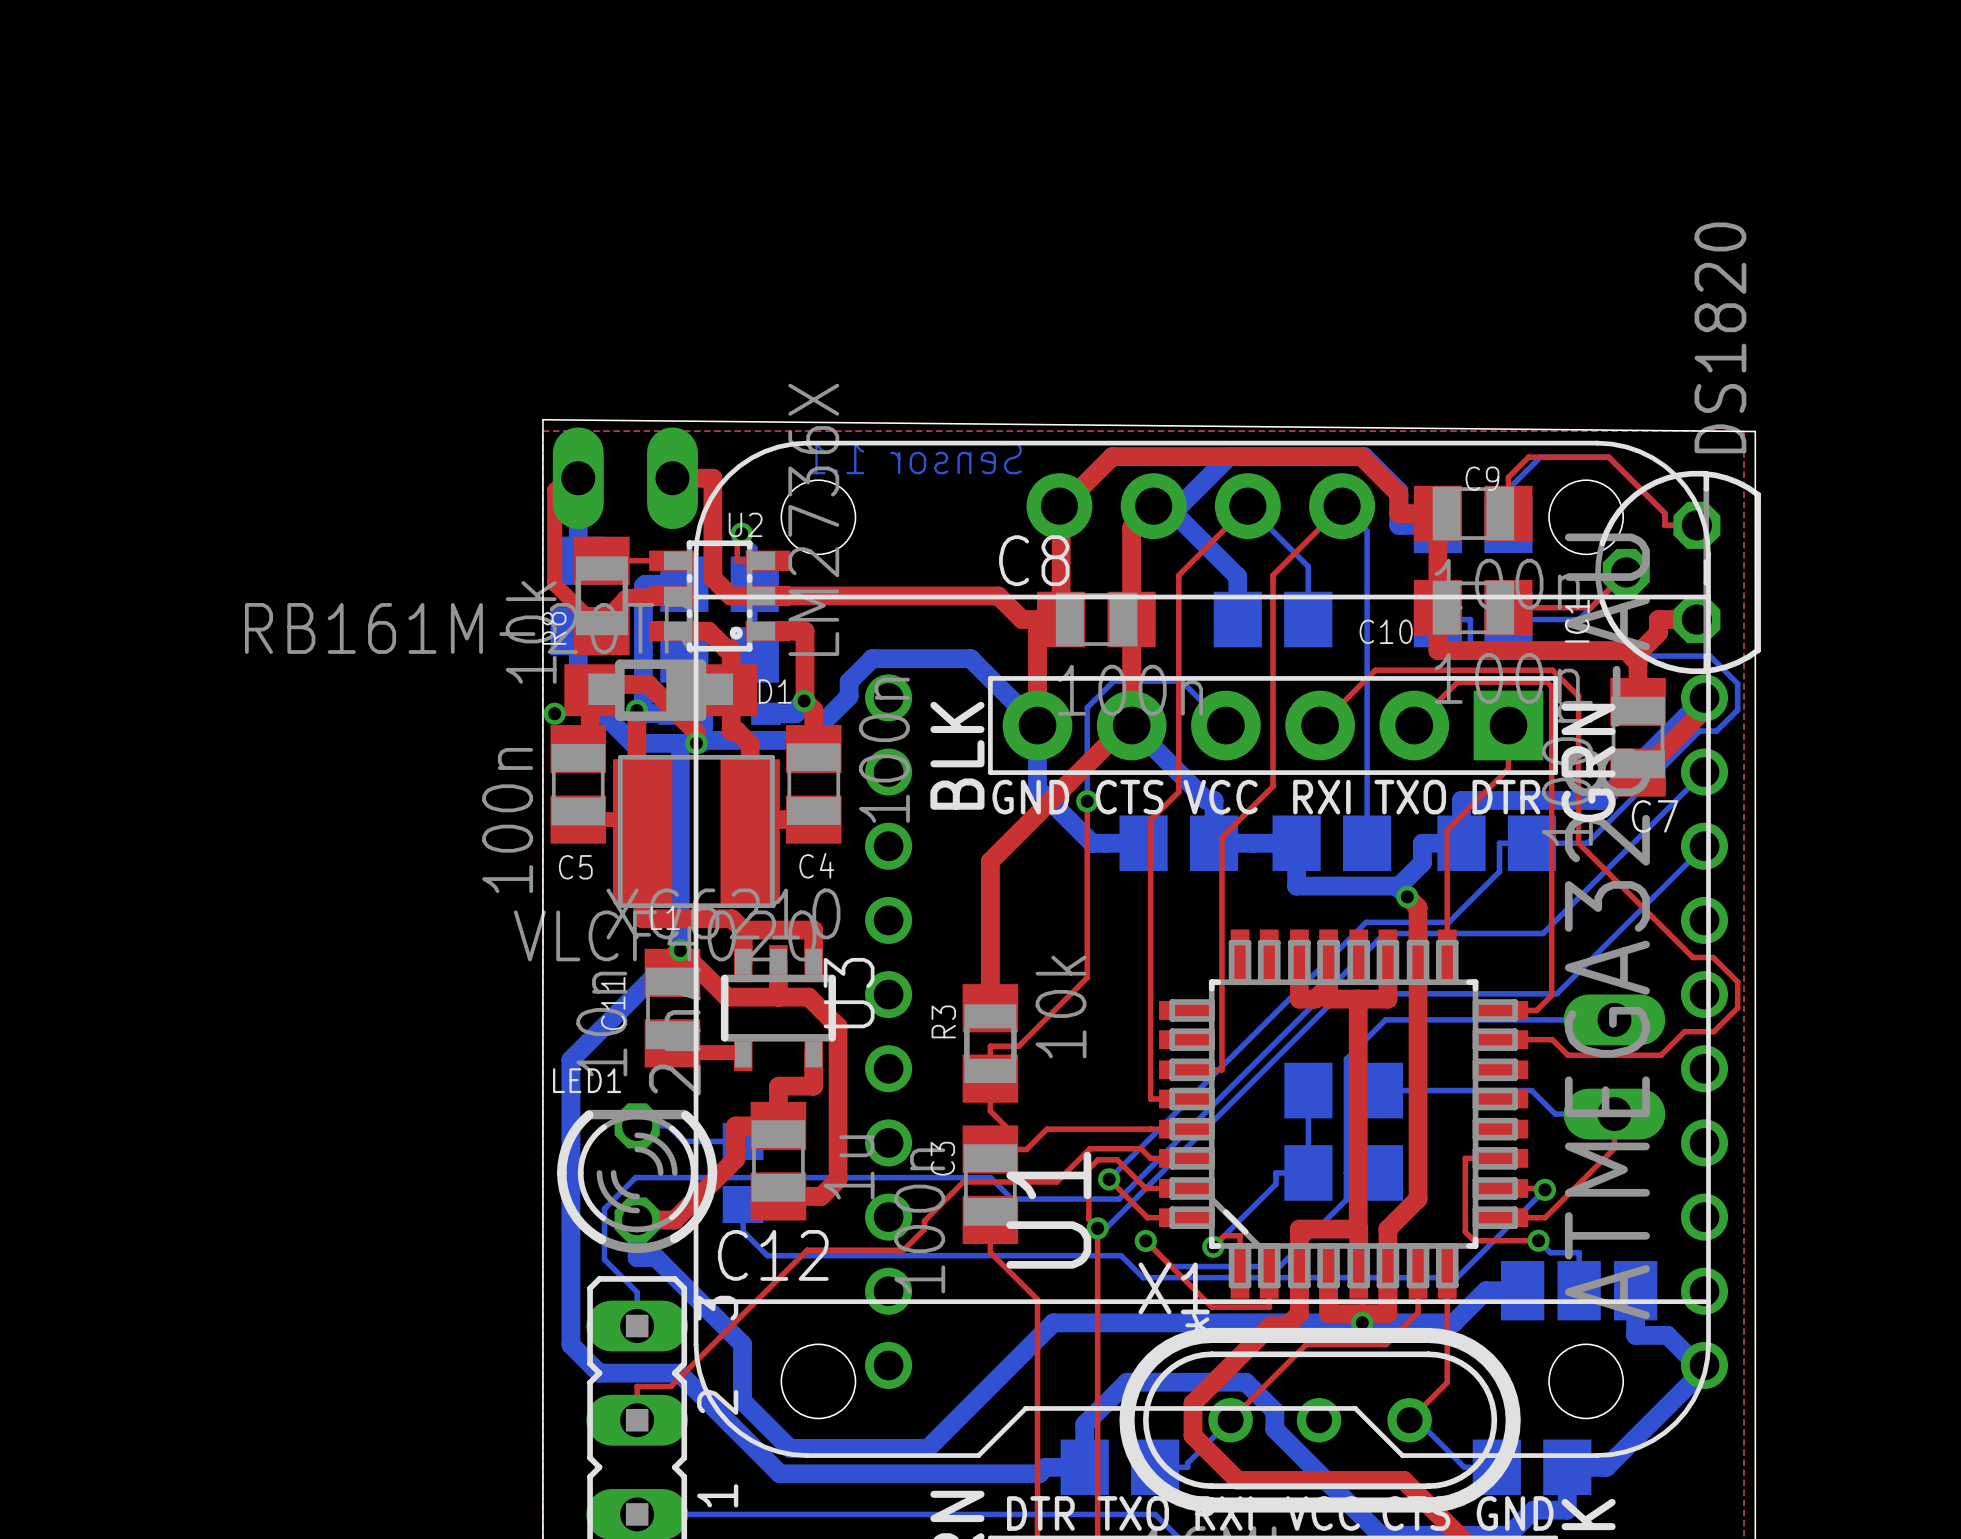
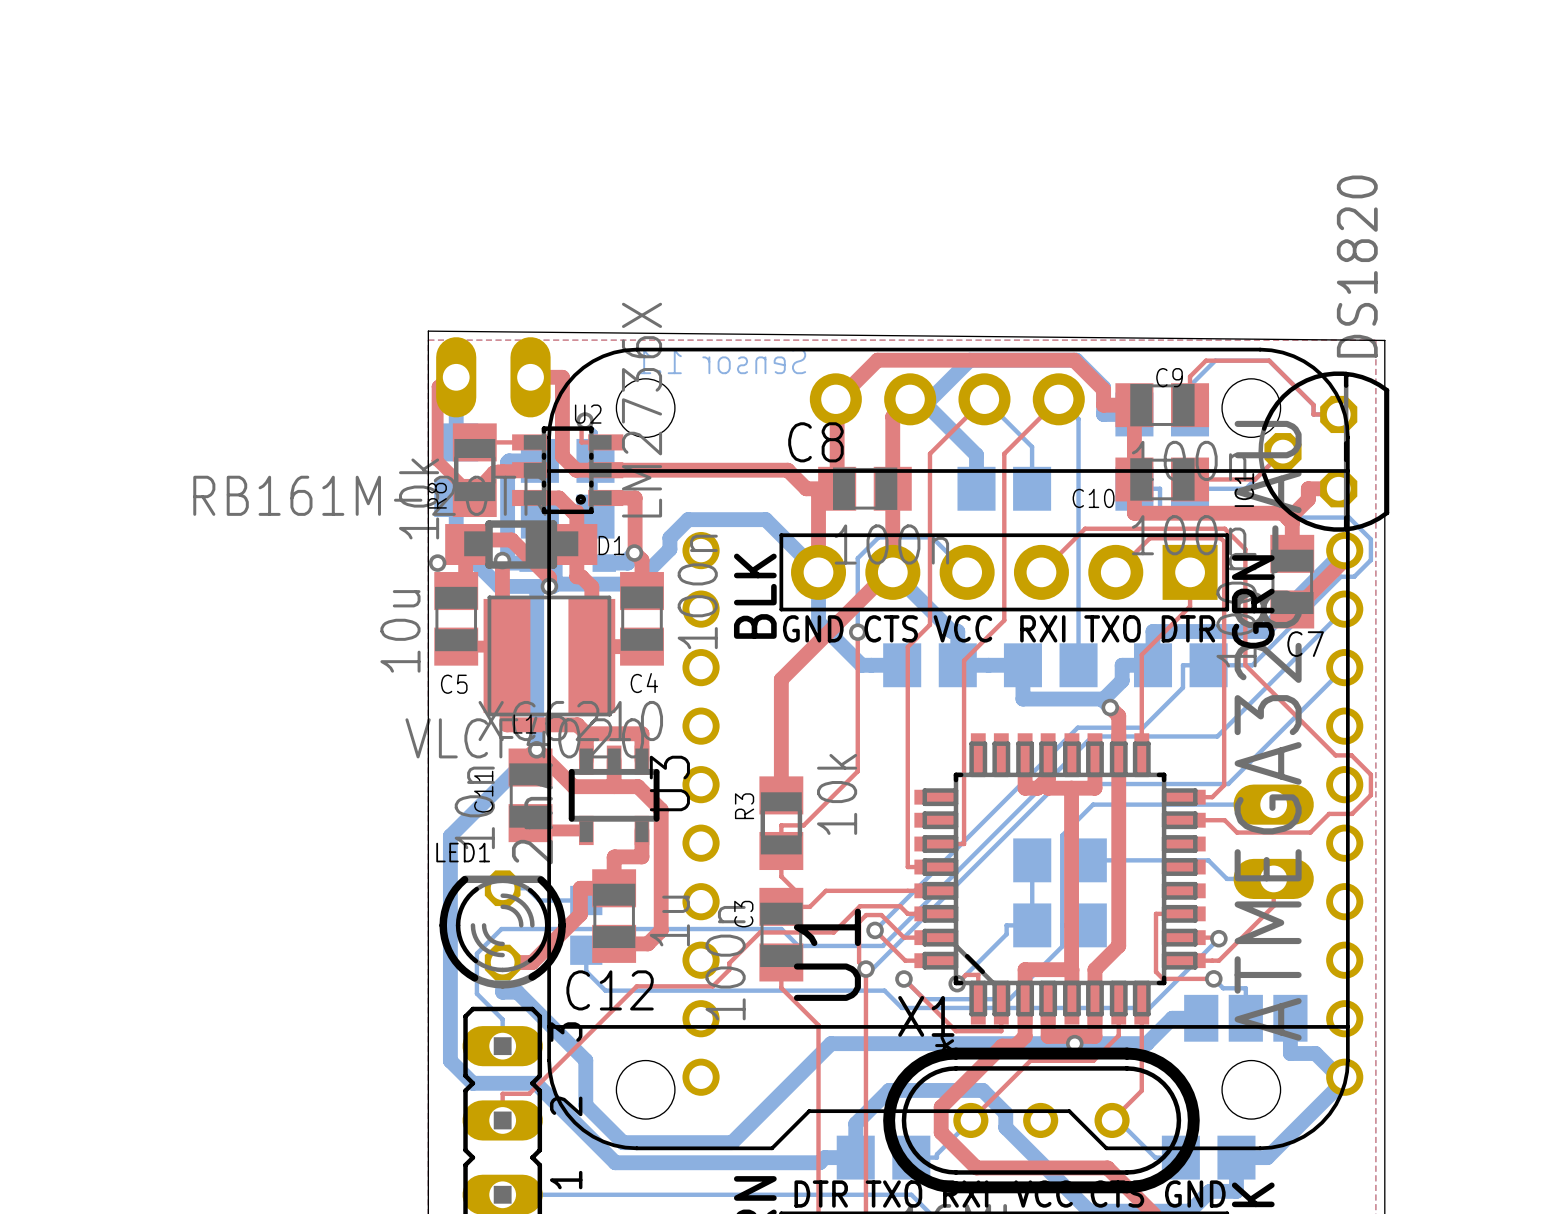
C5 value: 100n (507, 820) -> 10u (400, 631)

